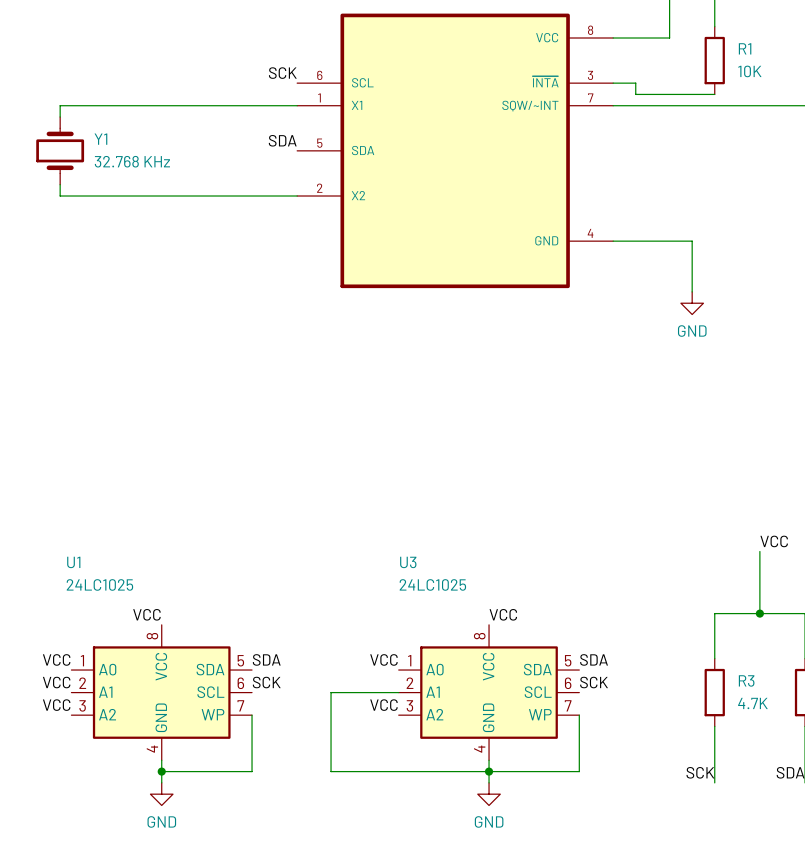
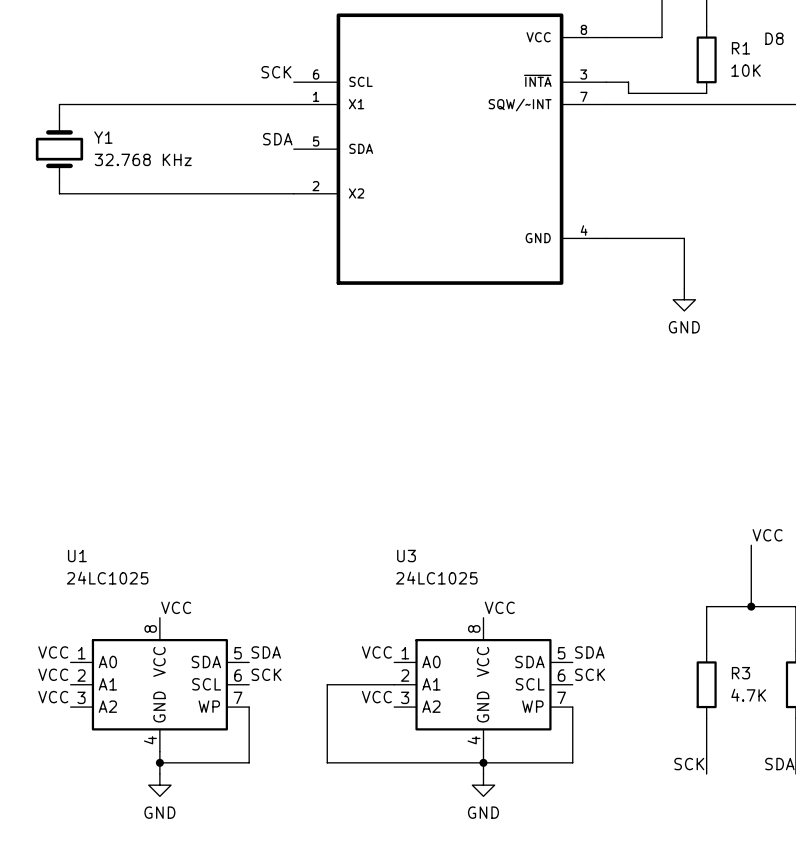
label: none -> D8 (774, 38)
label position: VCC (146, 614) -> VCC (176, 607)

